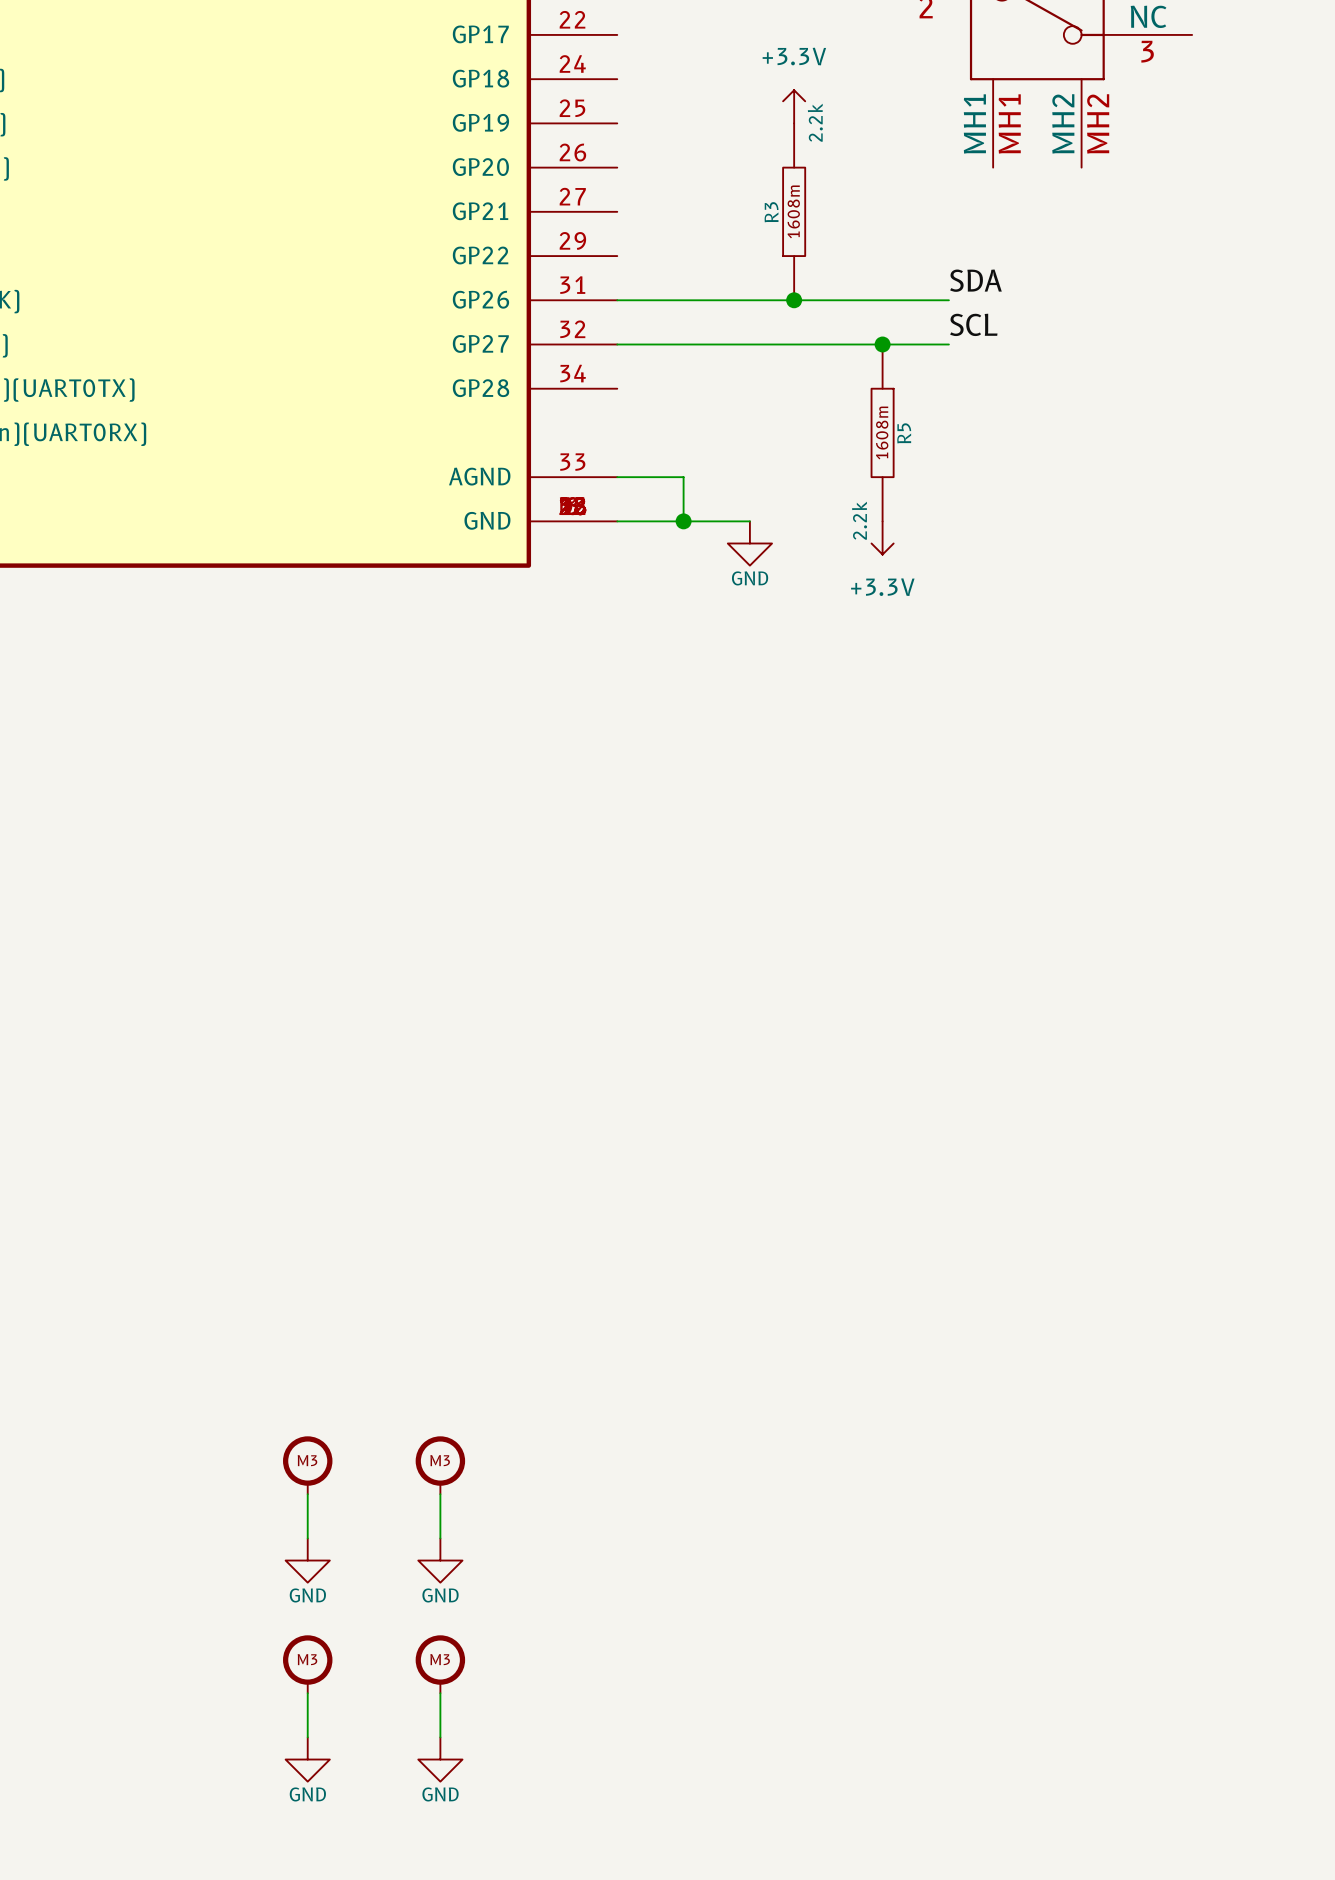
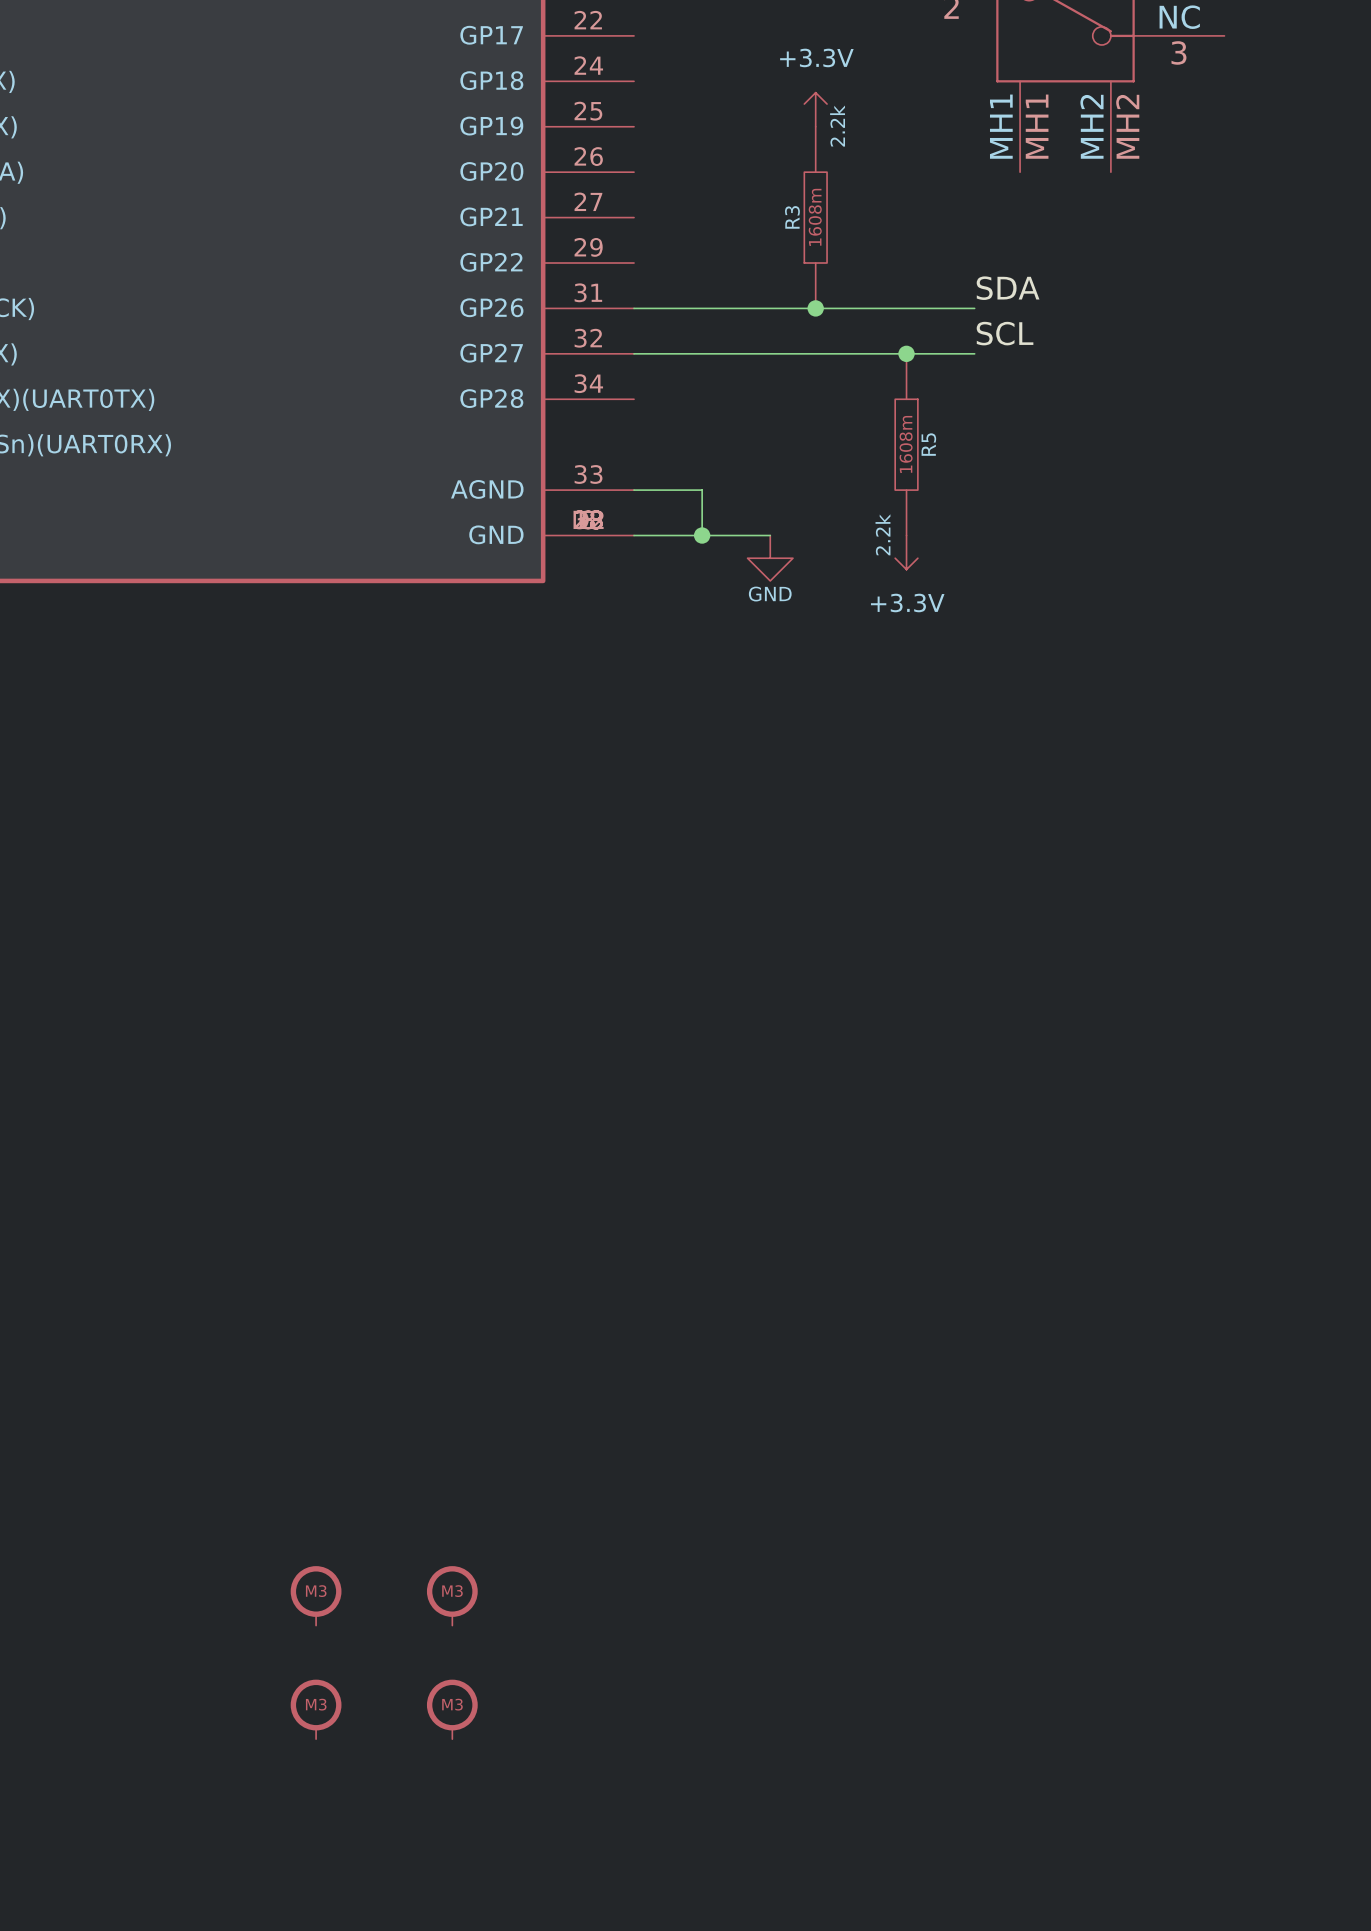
part: (307, 1465) -> none
part: (440, 1465) -> none
wire: (307, 1494) (307, 1538) -> none
wire: (440, 1494) (440, 1538) -> none
part: none -> (316, 1595)
part: none -> (452, 1595)
power symbol: GND (307, 1560) -> none
power symbol: GND (440, 1560) -> none
wire: (307, 1693) (307, 1737) -> none
wire: (440, 1693) (440, 1737) -> none
power symbol: GND (307, 1759) -> none
power symbol: GND (440, 1759) -> none

